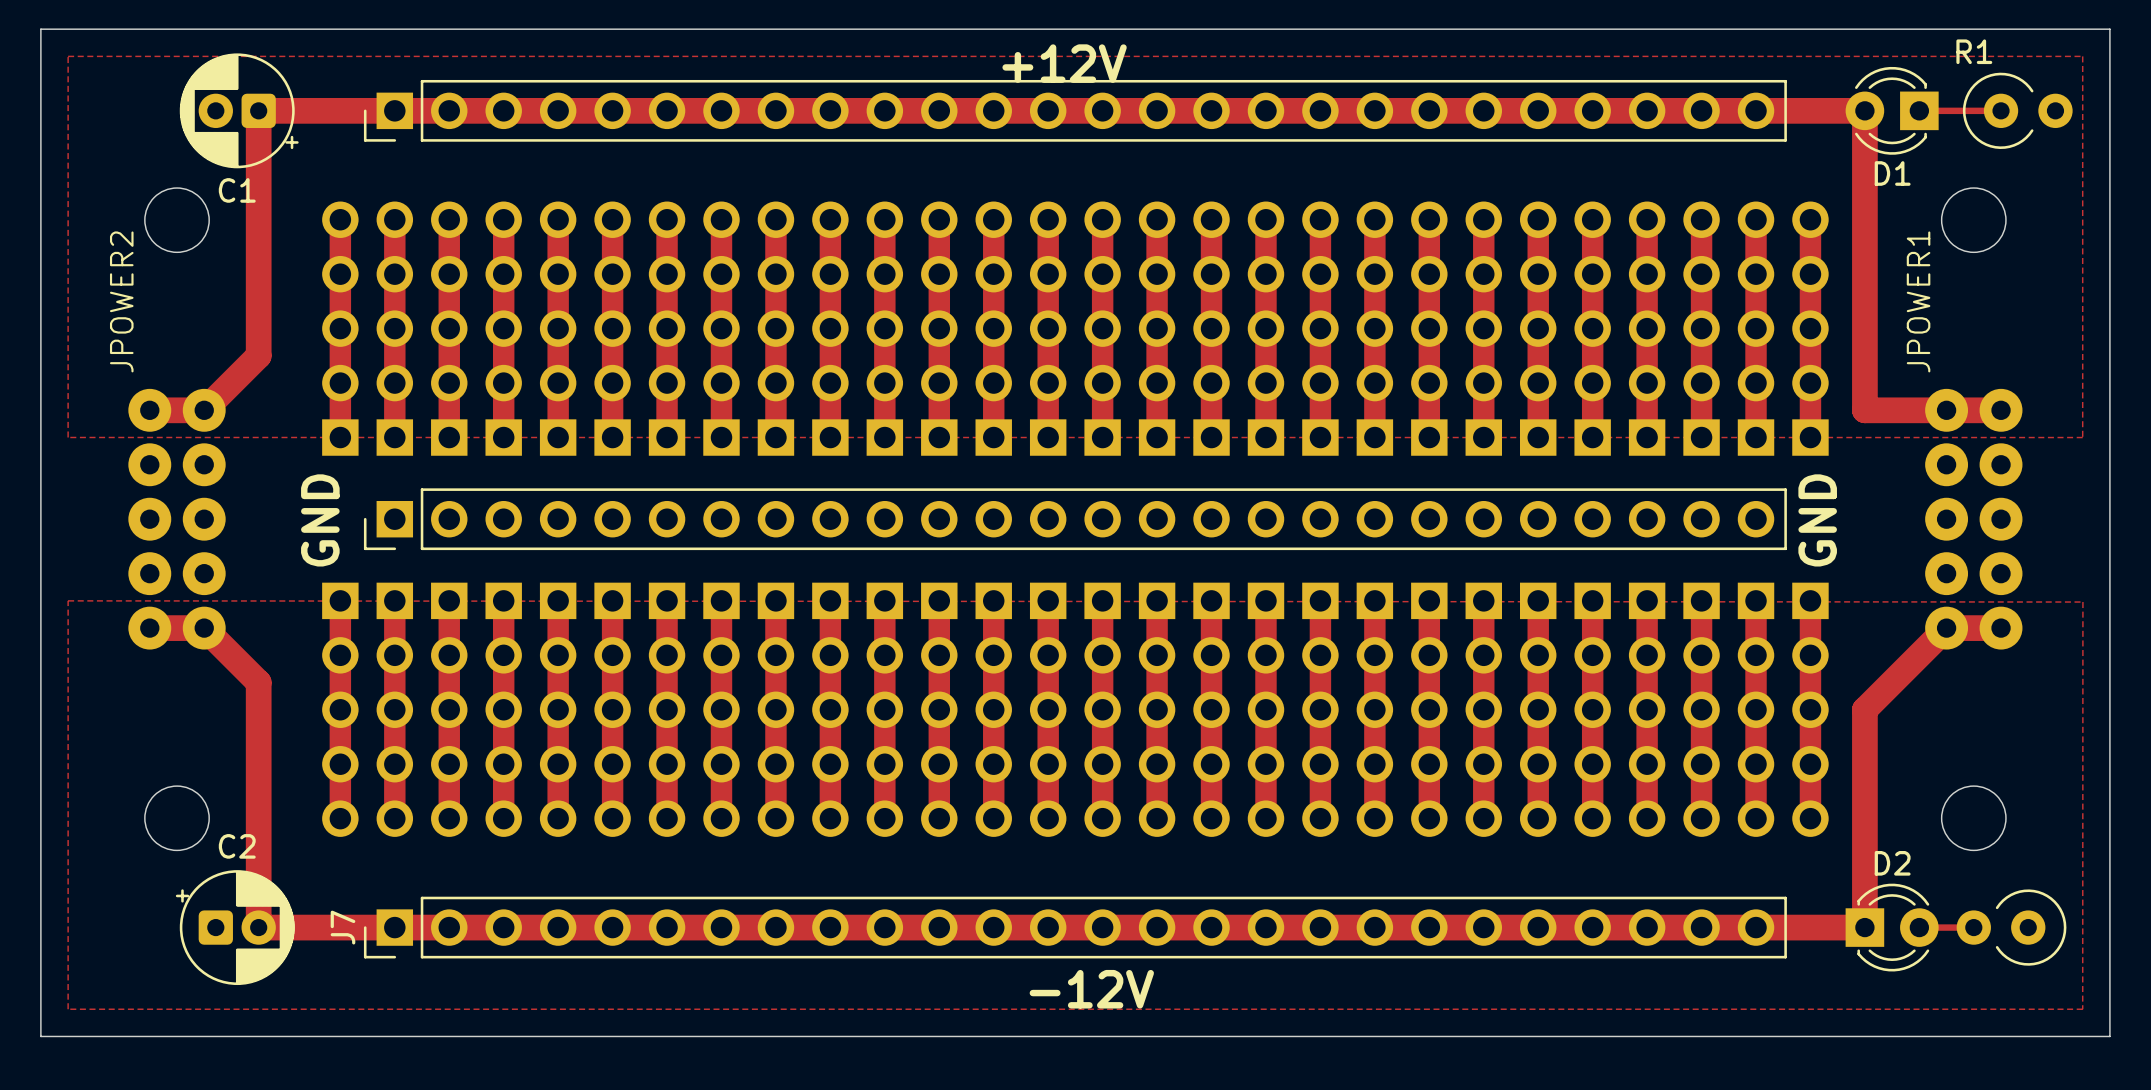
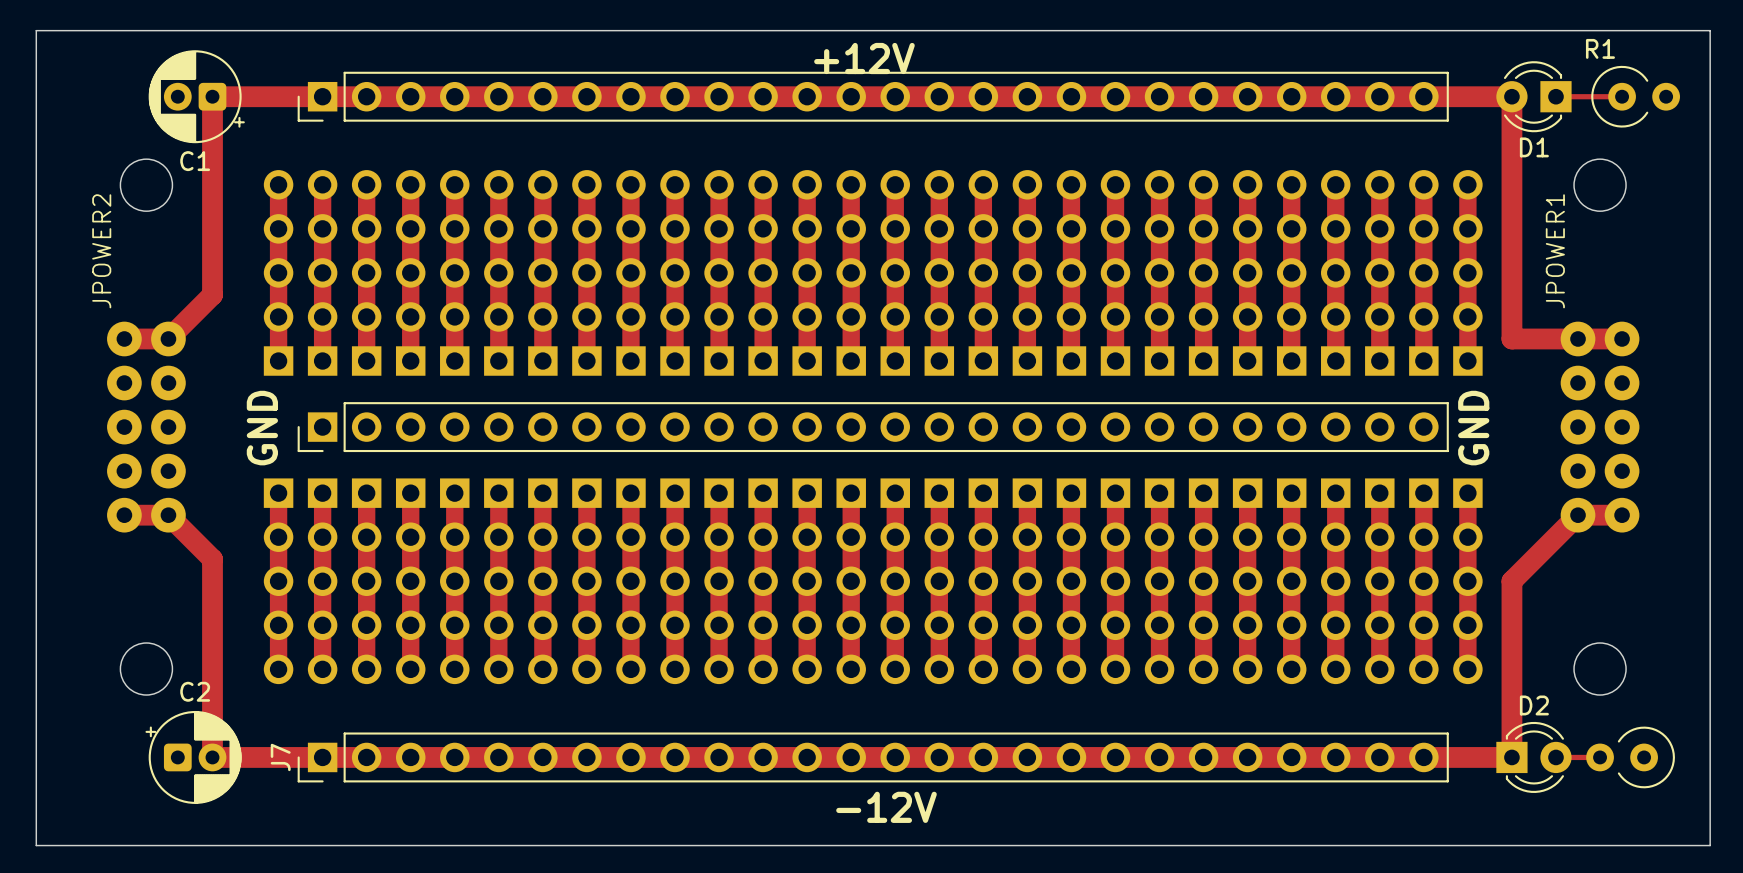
zone outline: (68, 56) (68, 437) (2082, 437) (2082, 56) (68, 56) -> none
zone outline: (68, 600) (68, 1009) (2082, 1009) (2082, 602) (68, 600) -> none

